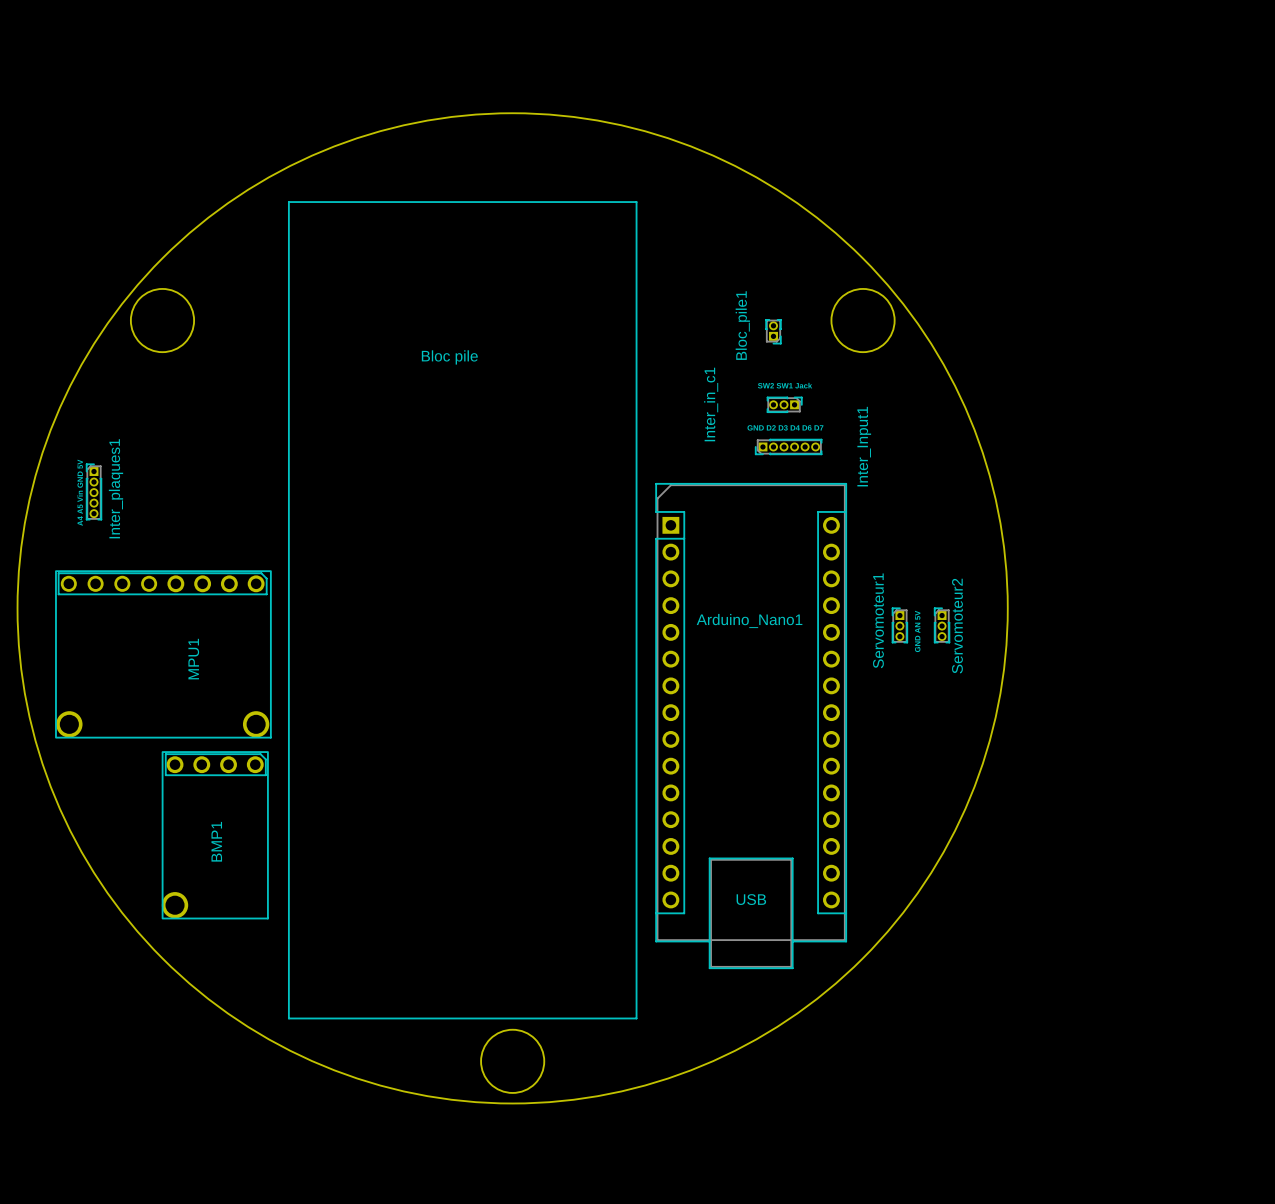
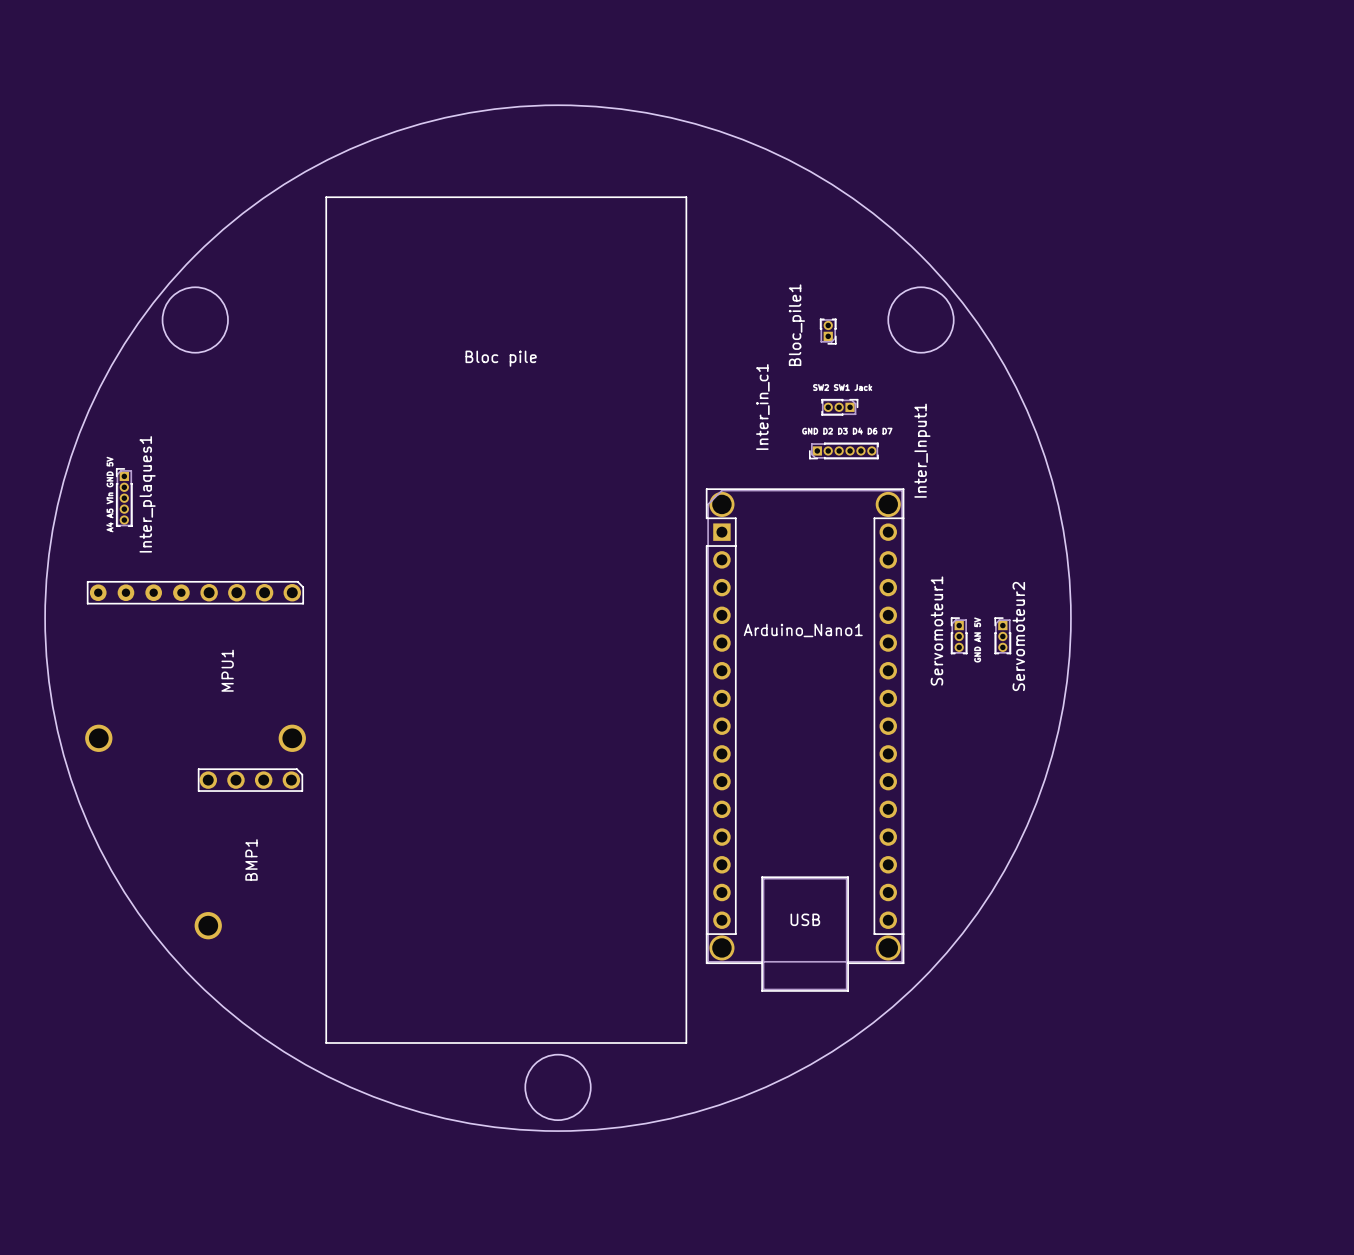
Arduino_Nano1 footprint: [655, 483, 847, 969] -> [706, 488, 905, 992]
MPU1 footprint: [55, 570, 272, 739] -> [85, 581, 306, 752]
BMP1 footprint: [161, 751, 269, 920] -> [194, 768, 303, 940]

